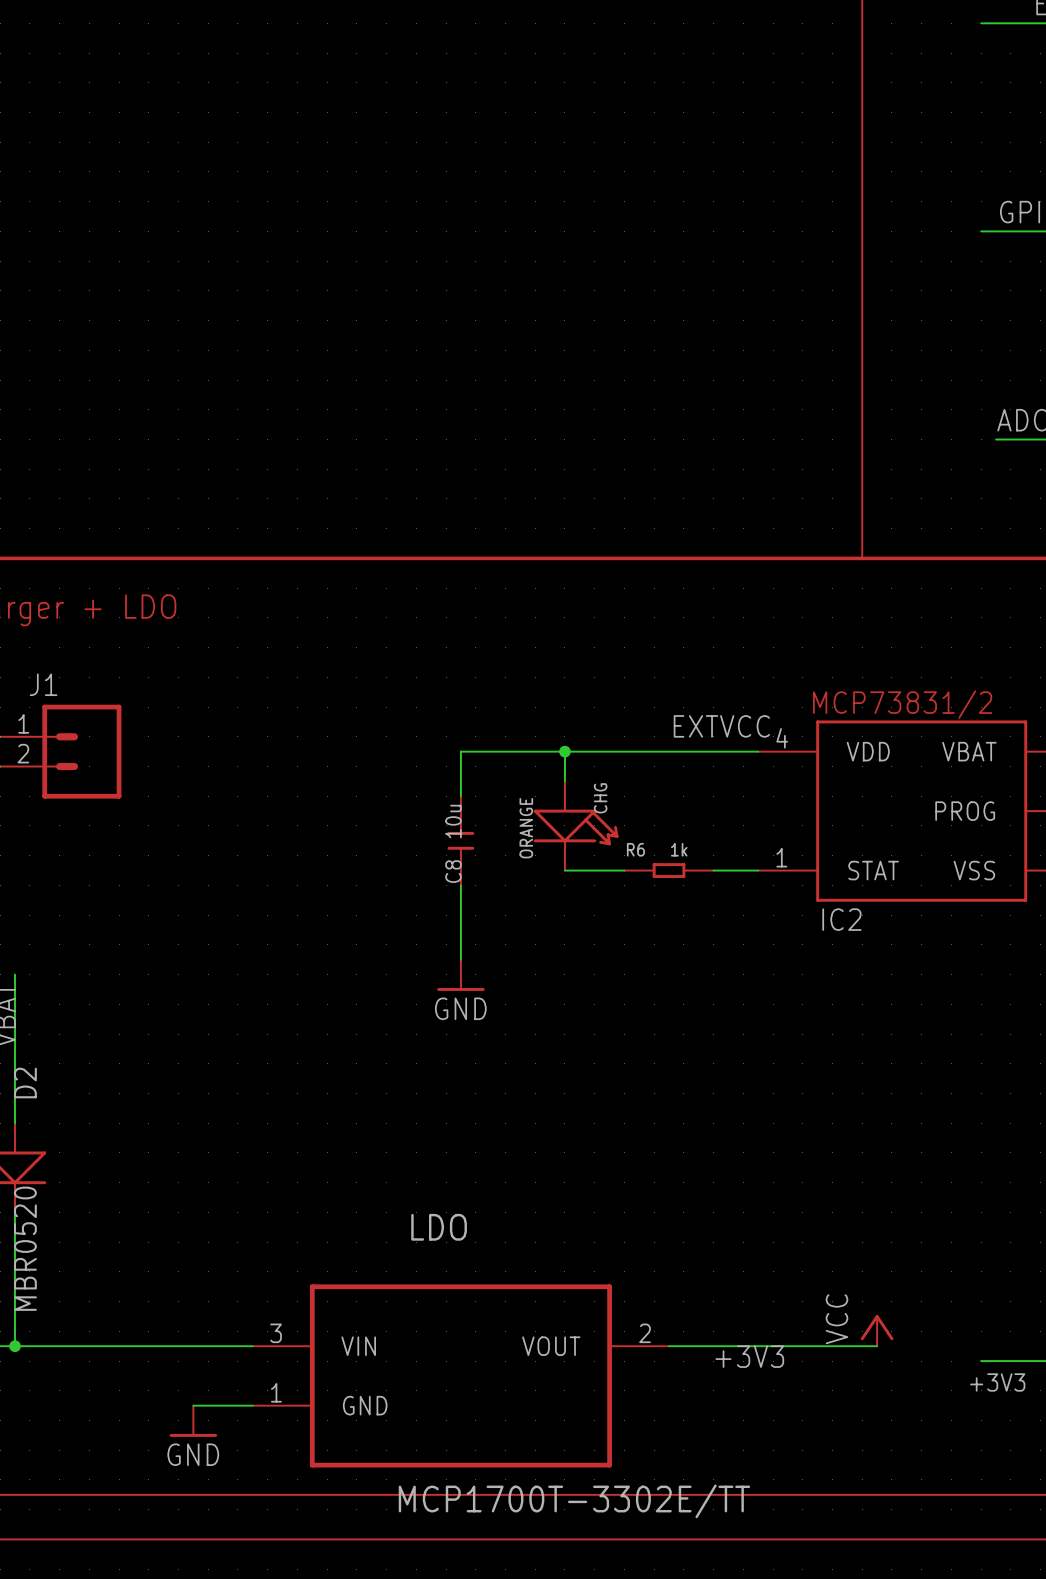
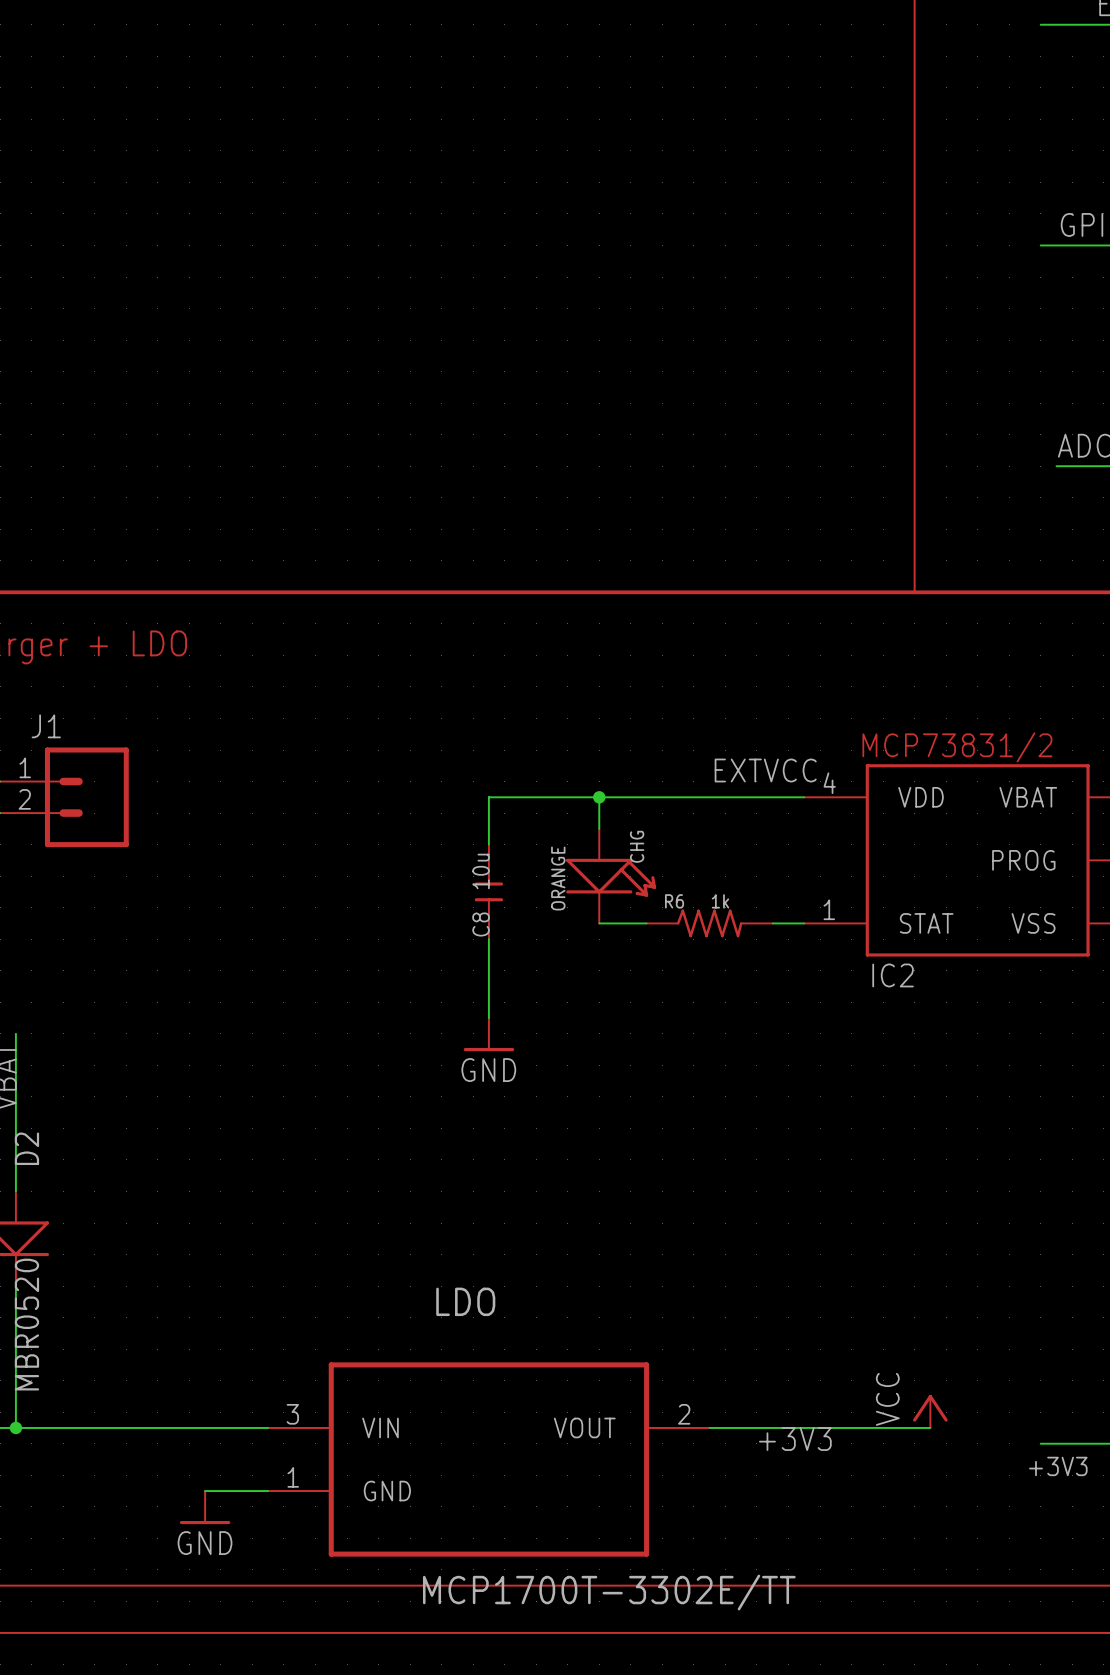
R6 symbol: [624, 863, 714, 878] -> [646, 909, 773, 938]

